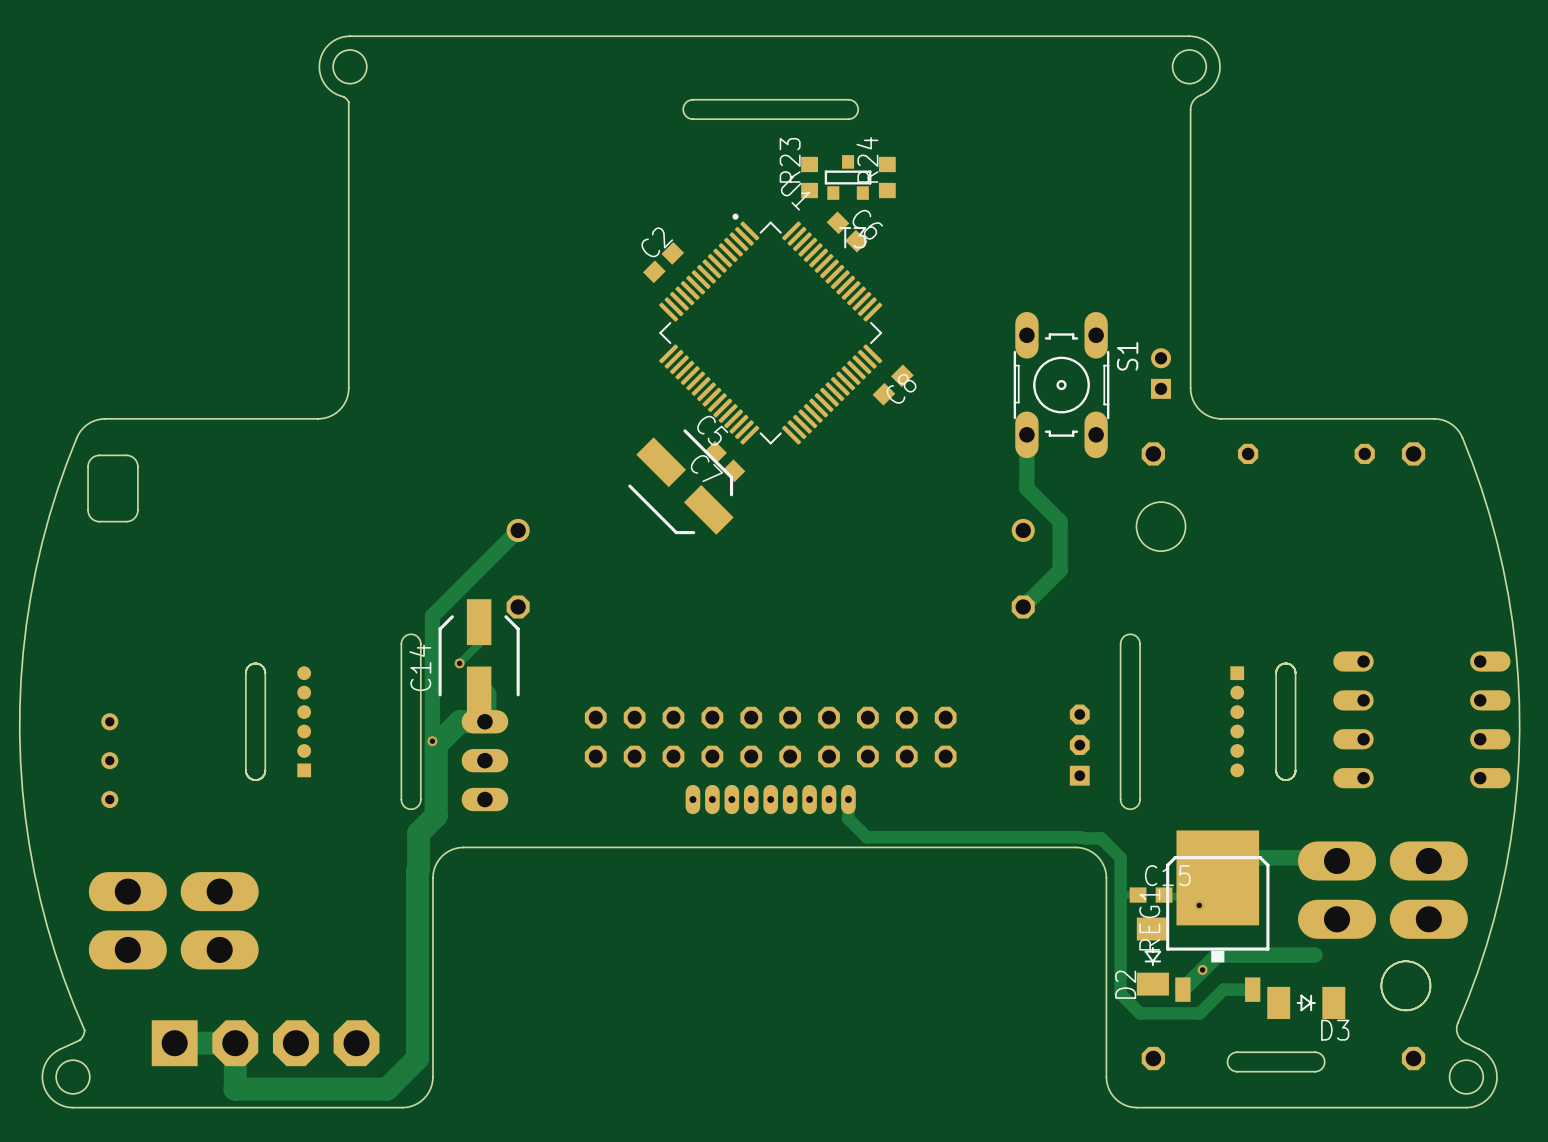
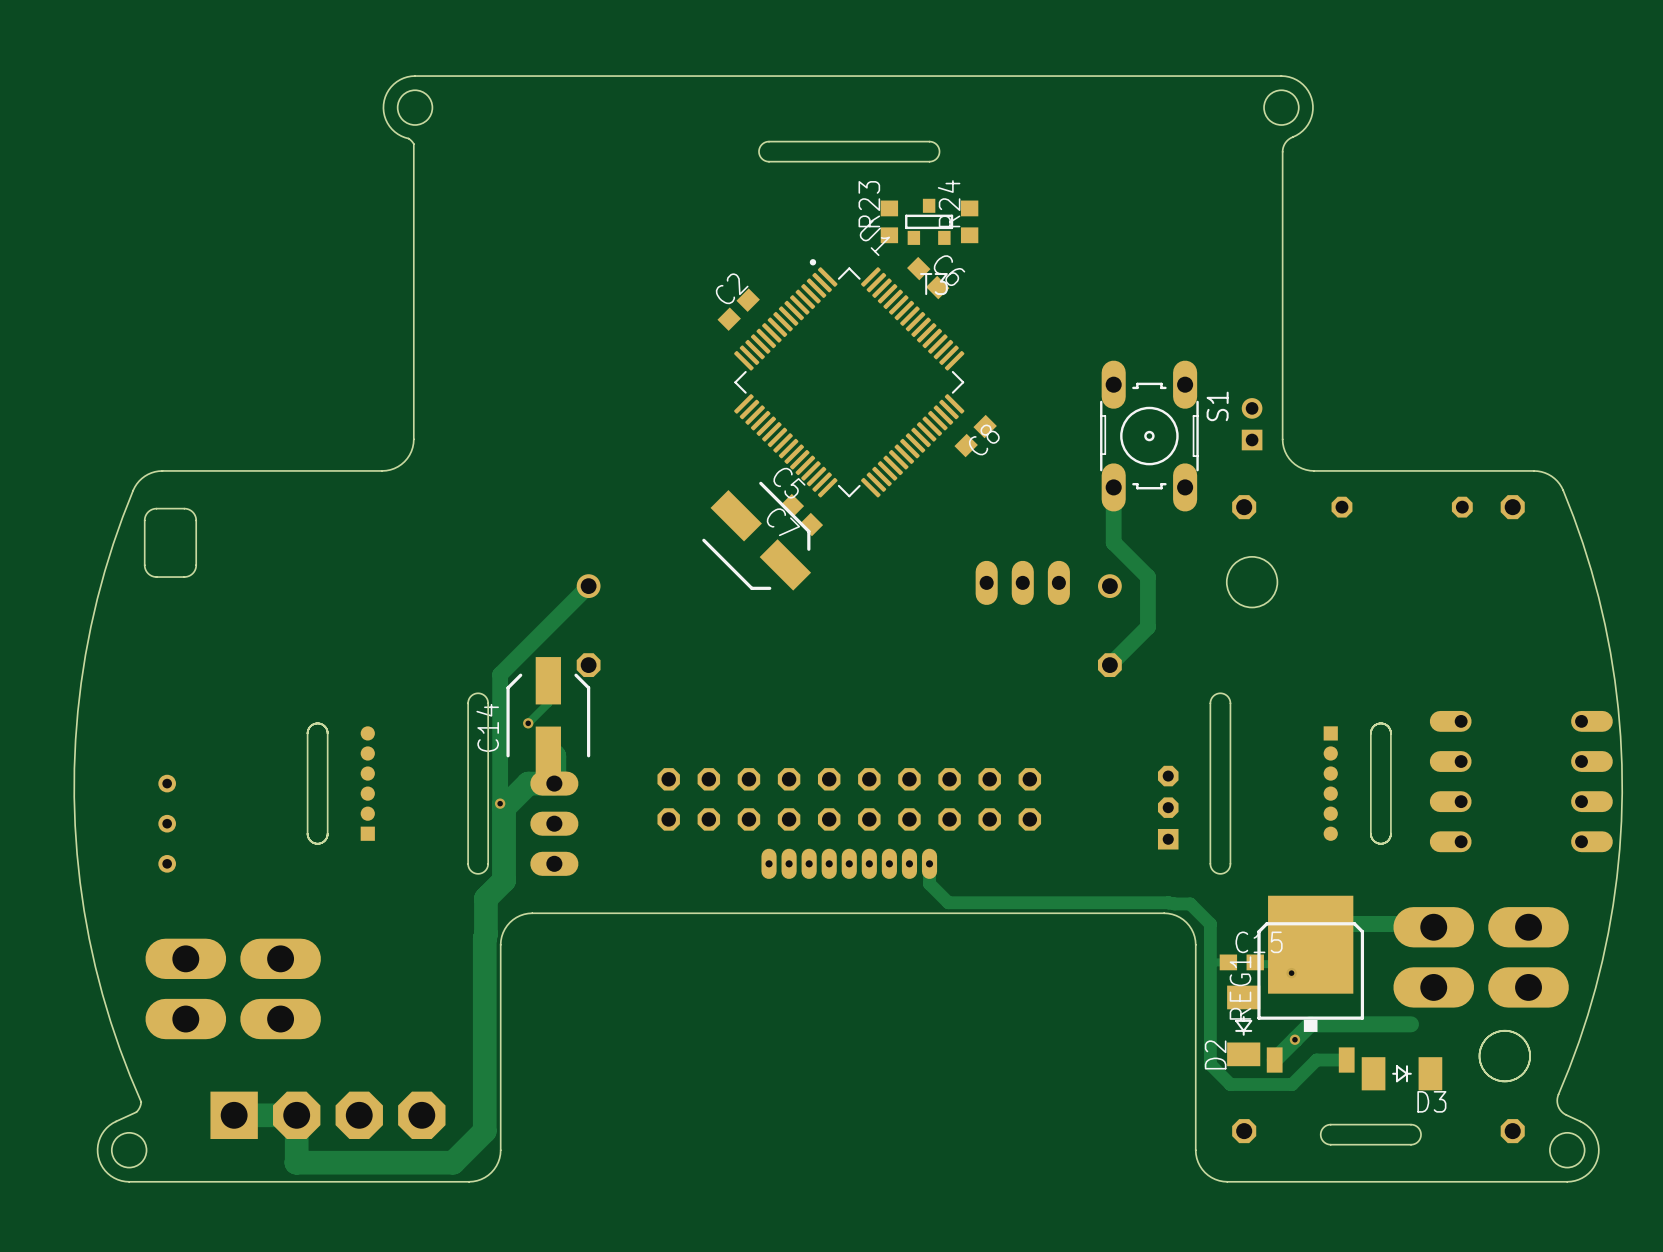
part: none -> (1022, 582)

